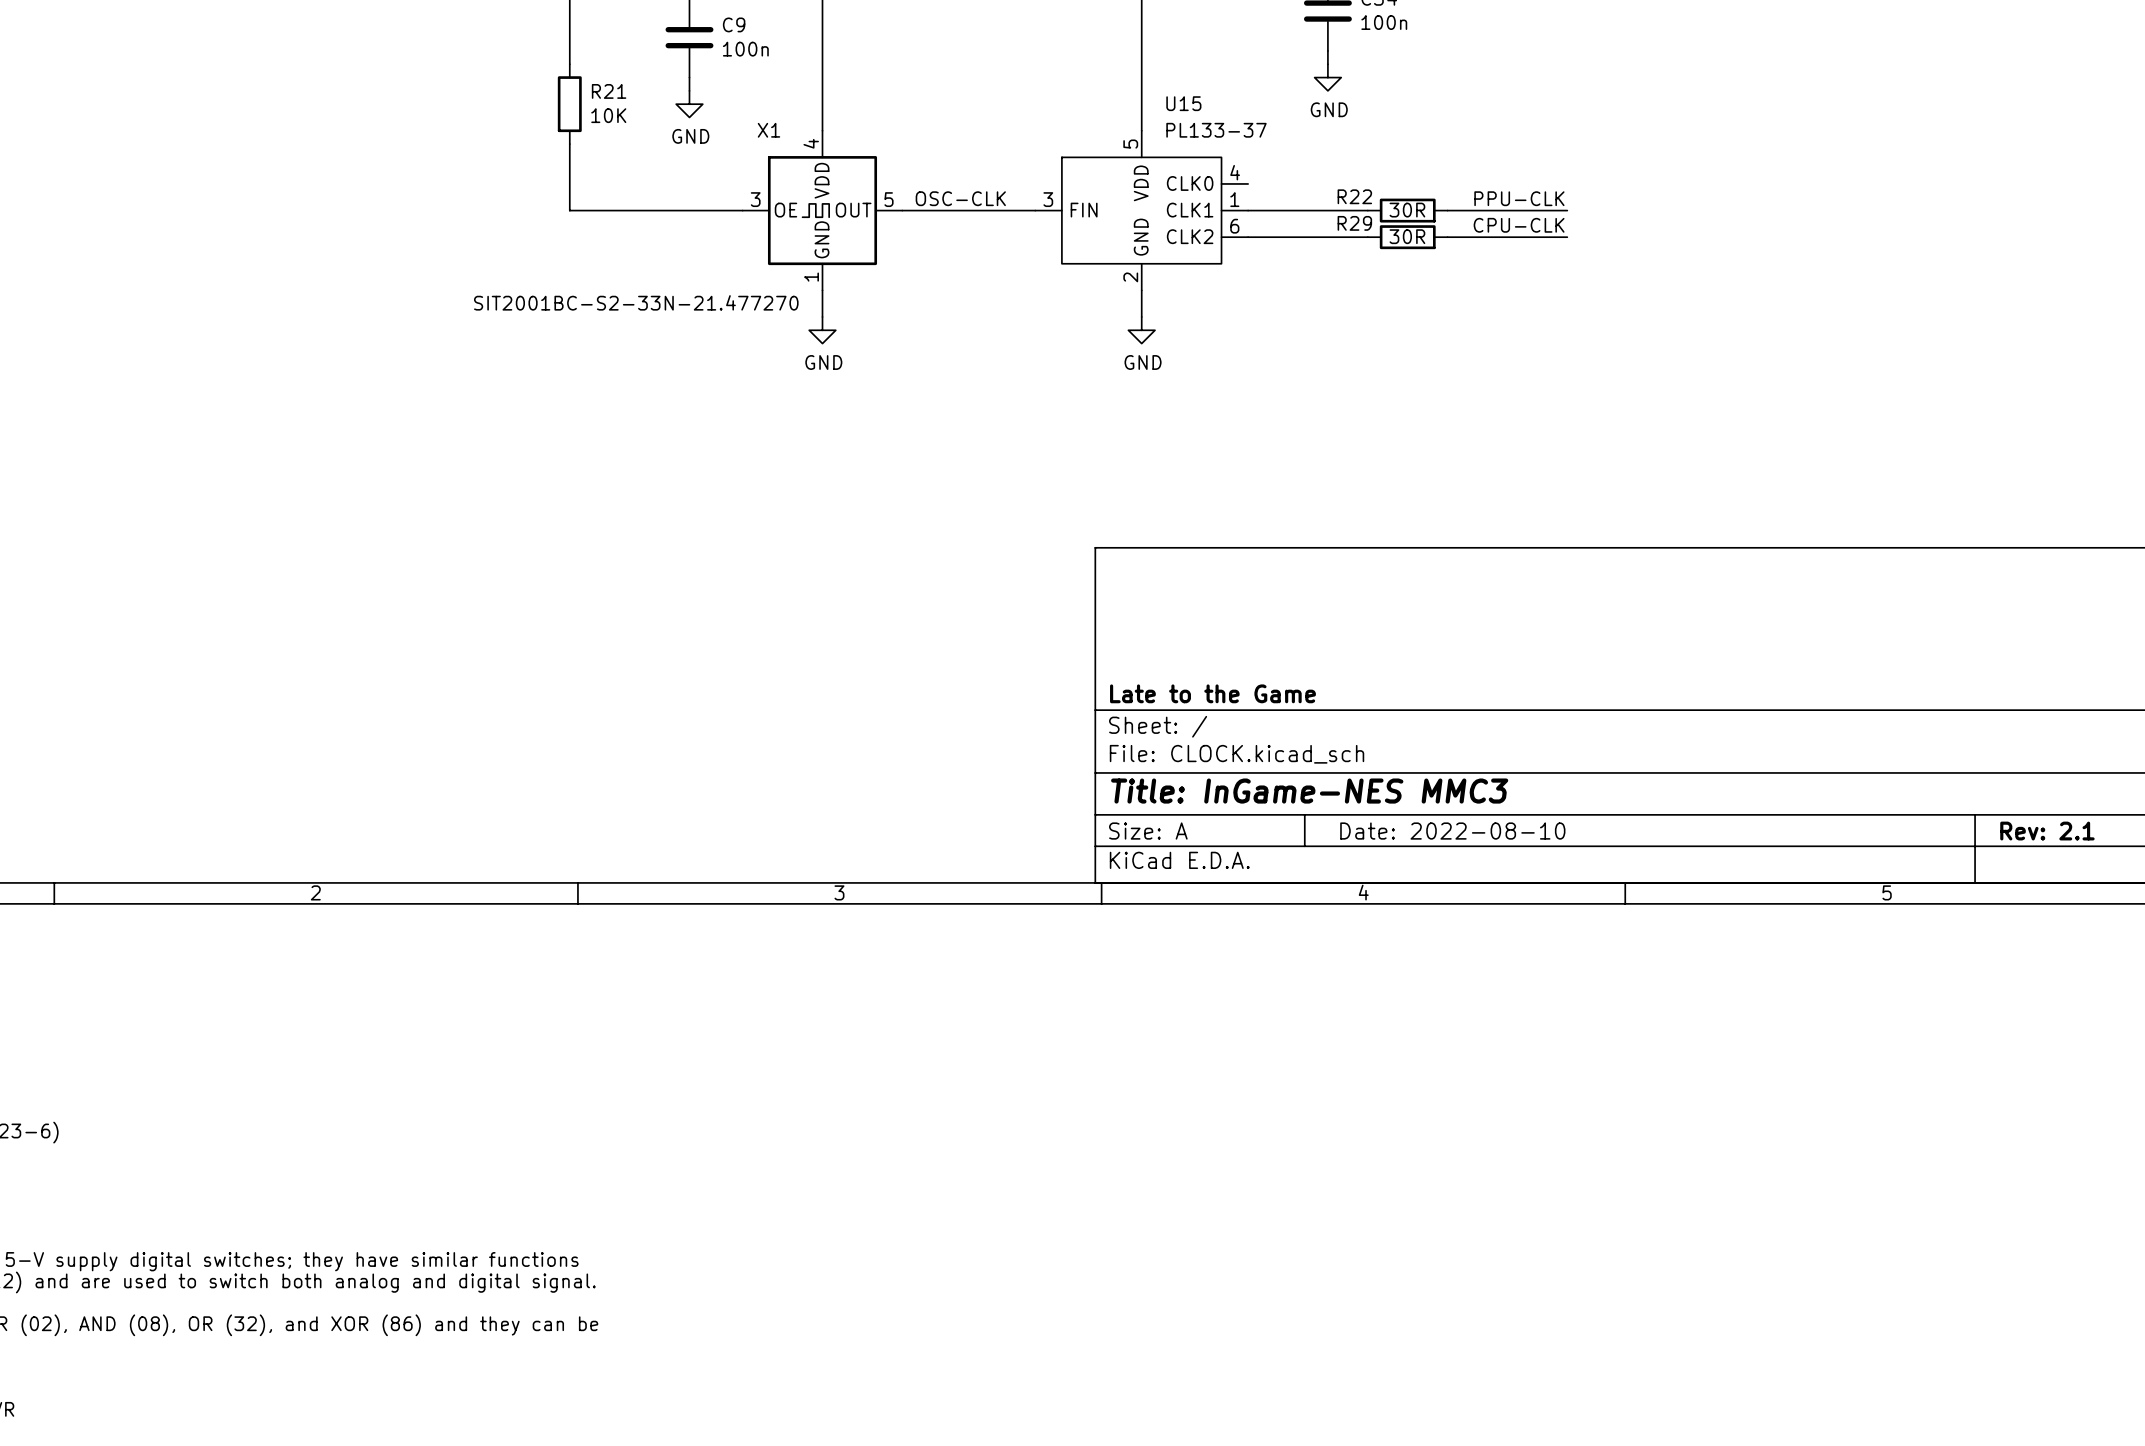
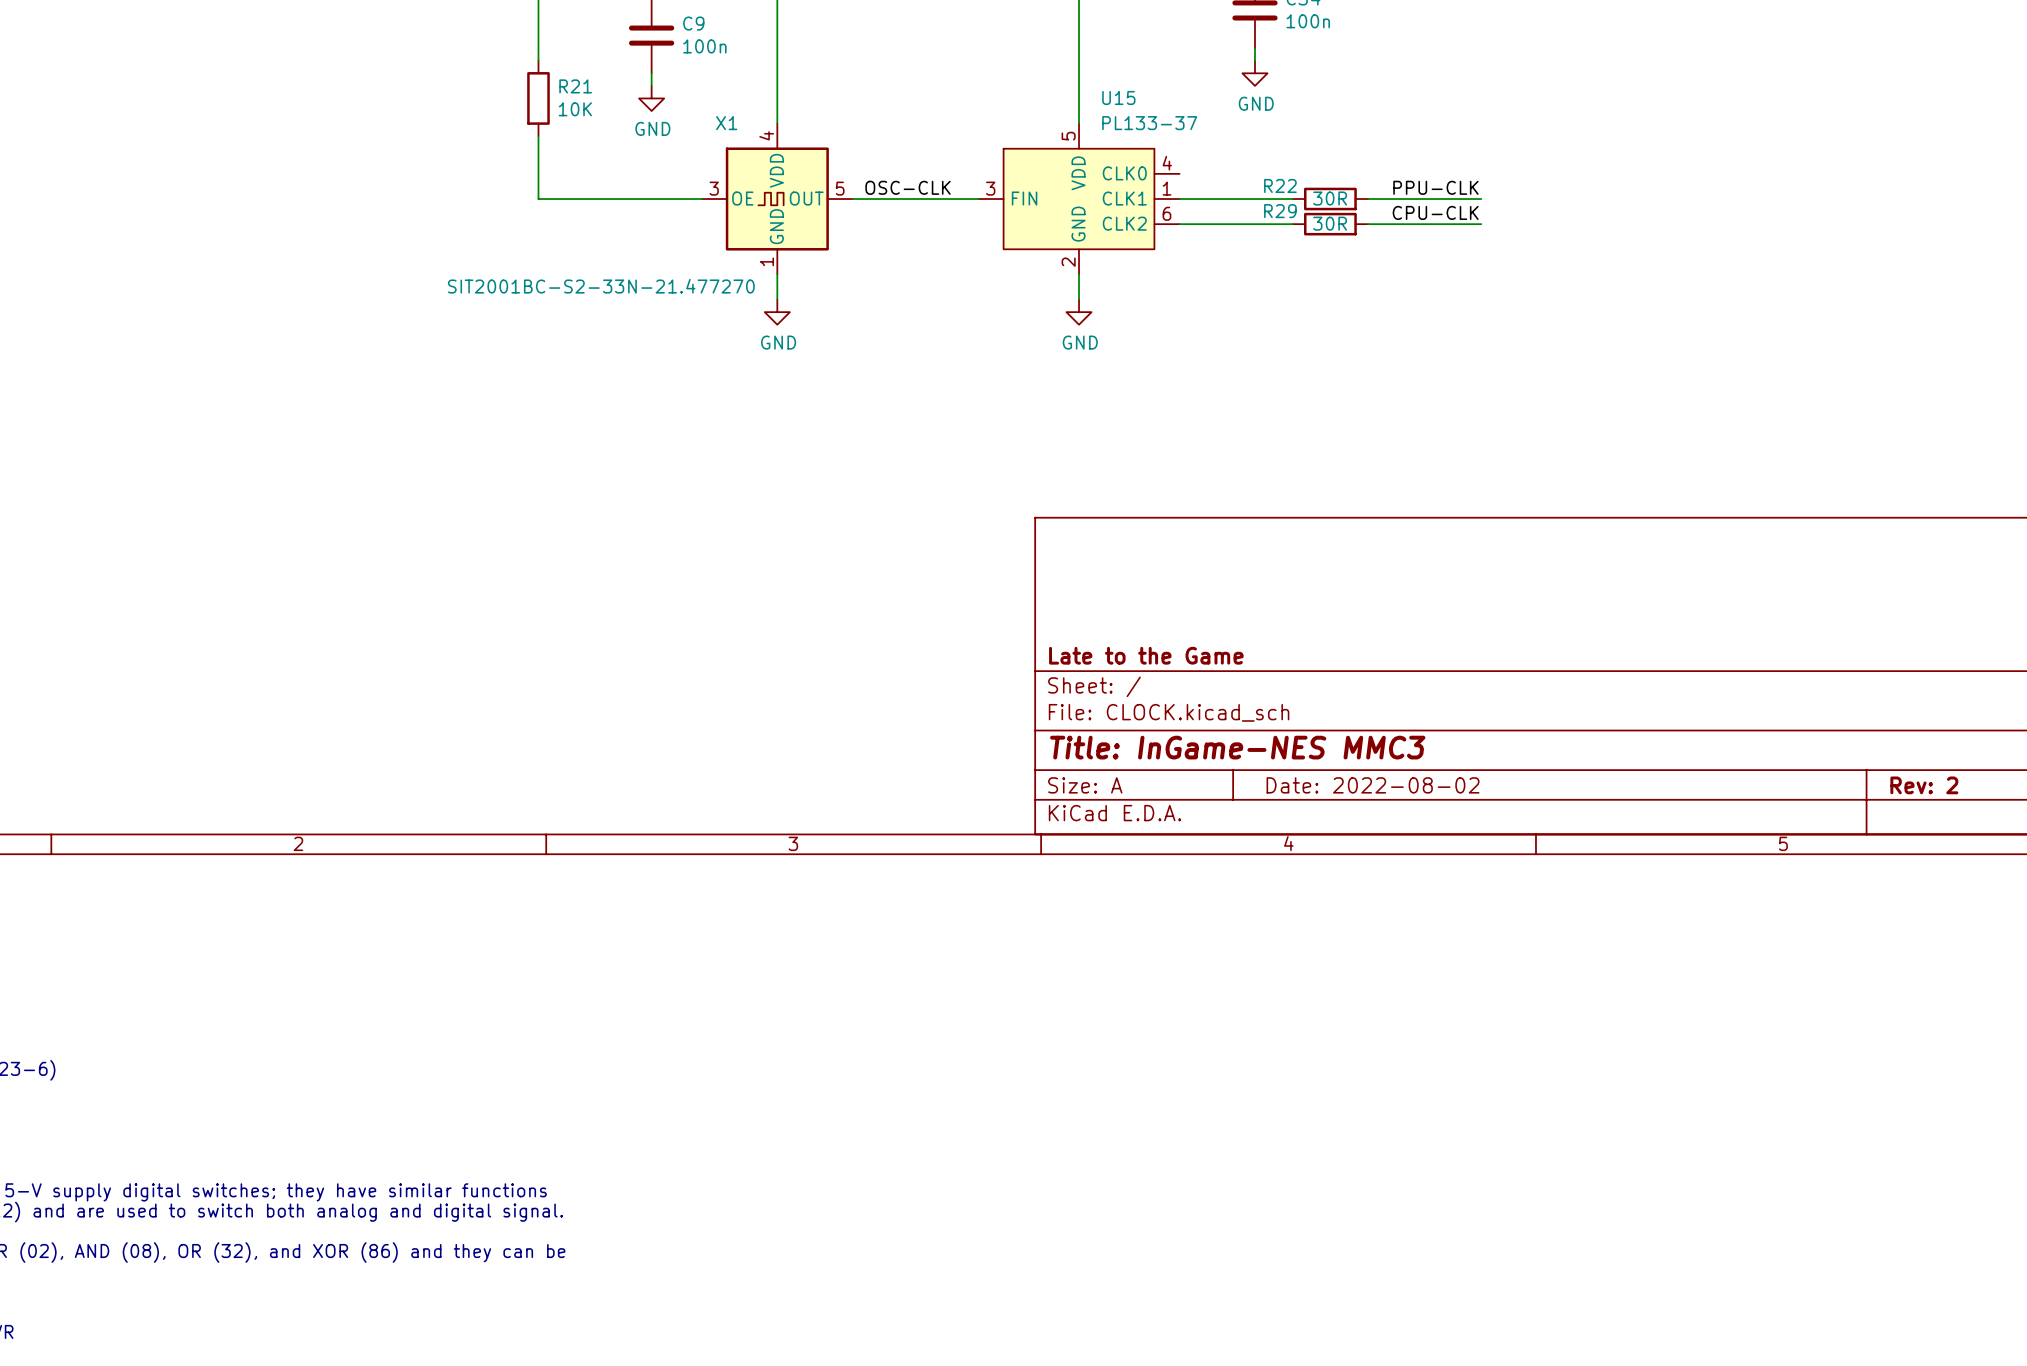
title block: Date: 2022-08-10 (1452, 831) -> Date: 2022-08-02 (1373, 785)
title block: Rev: 2.1 (2047, 831) -> Rev: 2 (1924, 785)

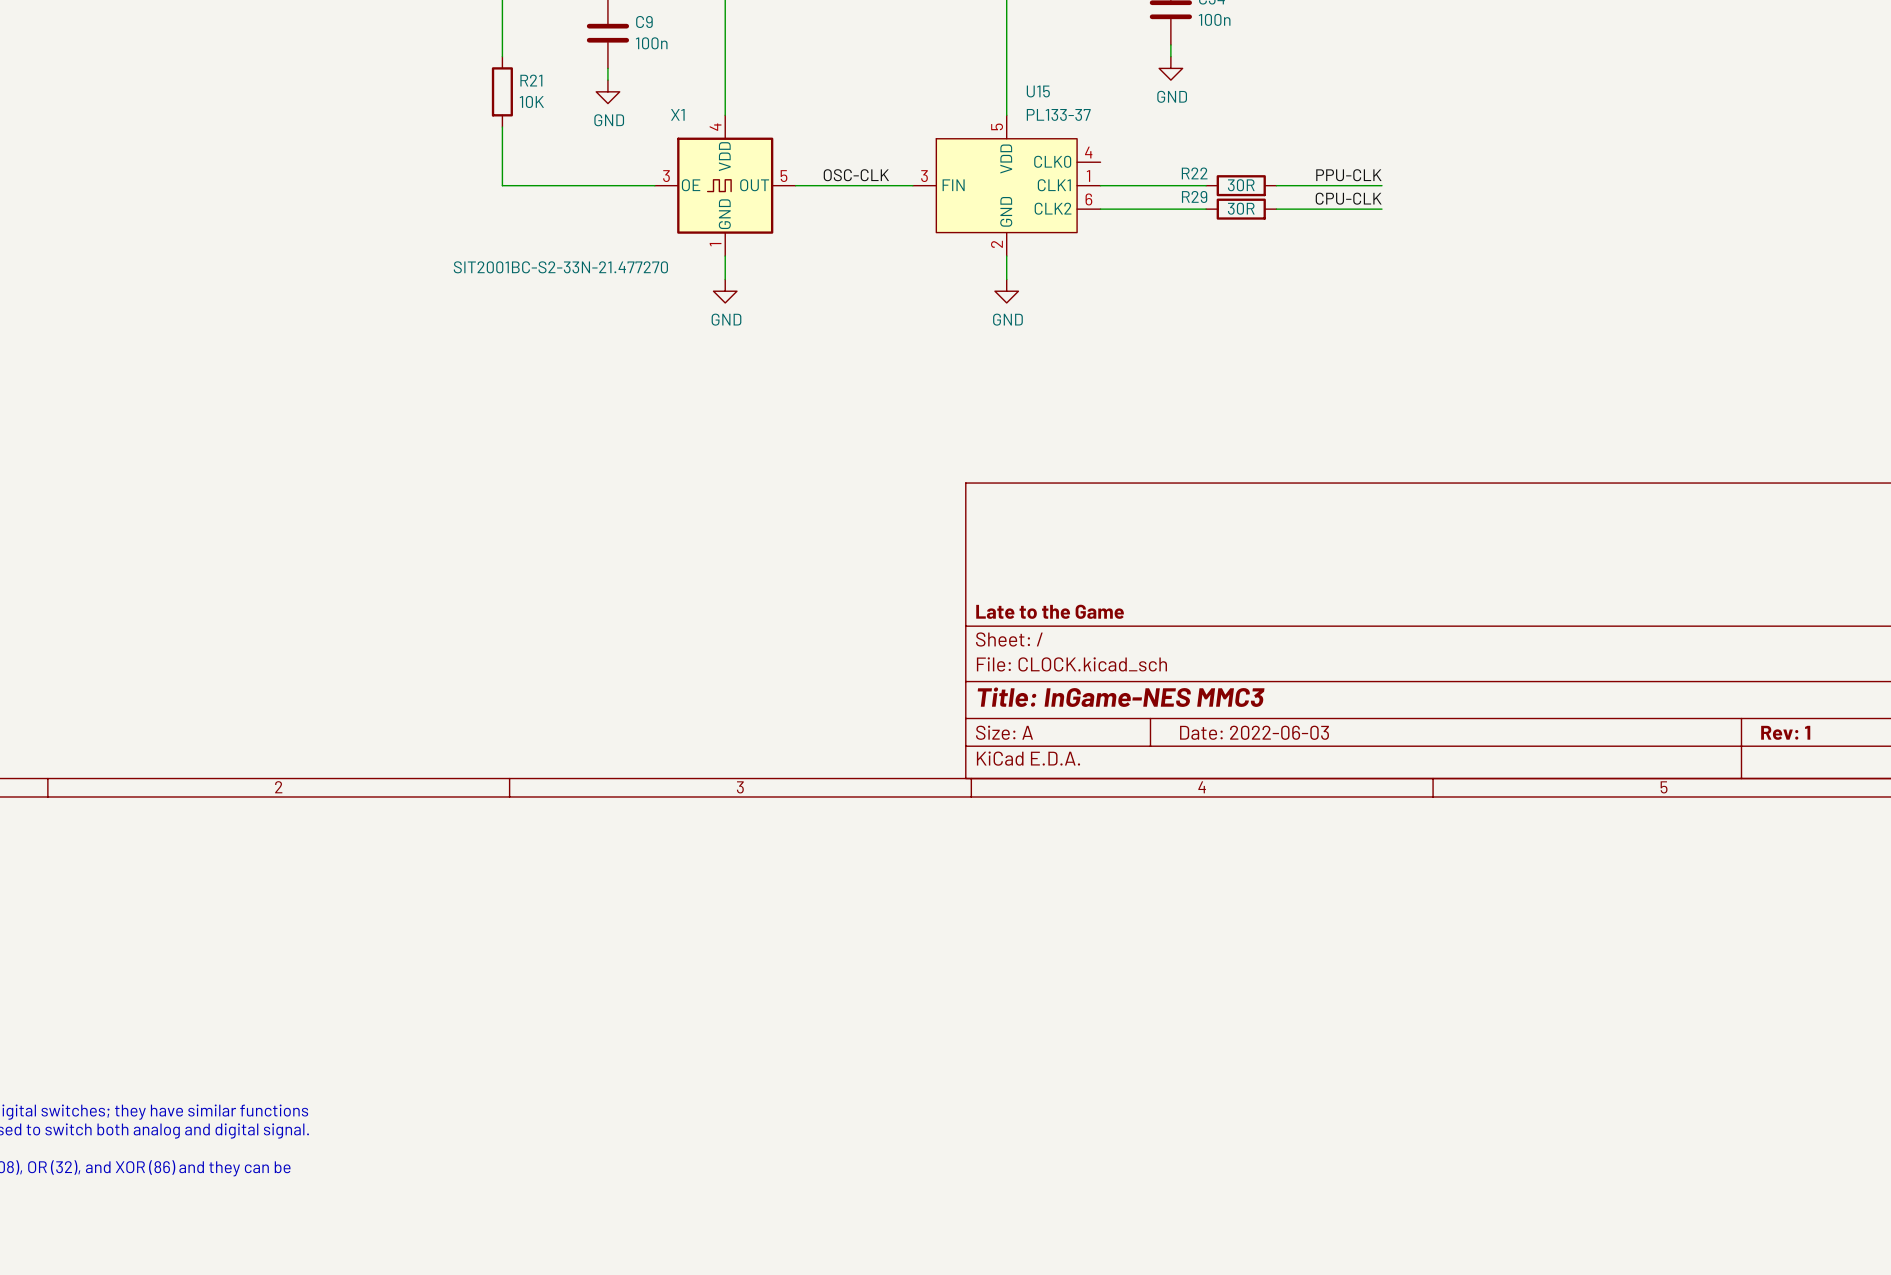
title block: Date: 2022-08-02 (1373, 785) -> Date: 2022-06-03 (1254, 732)
title block: Rev: 2 (1924, 785) -> Rev: 1 (1785, 732)

